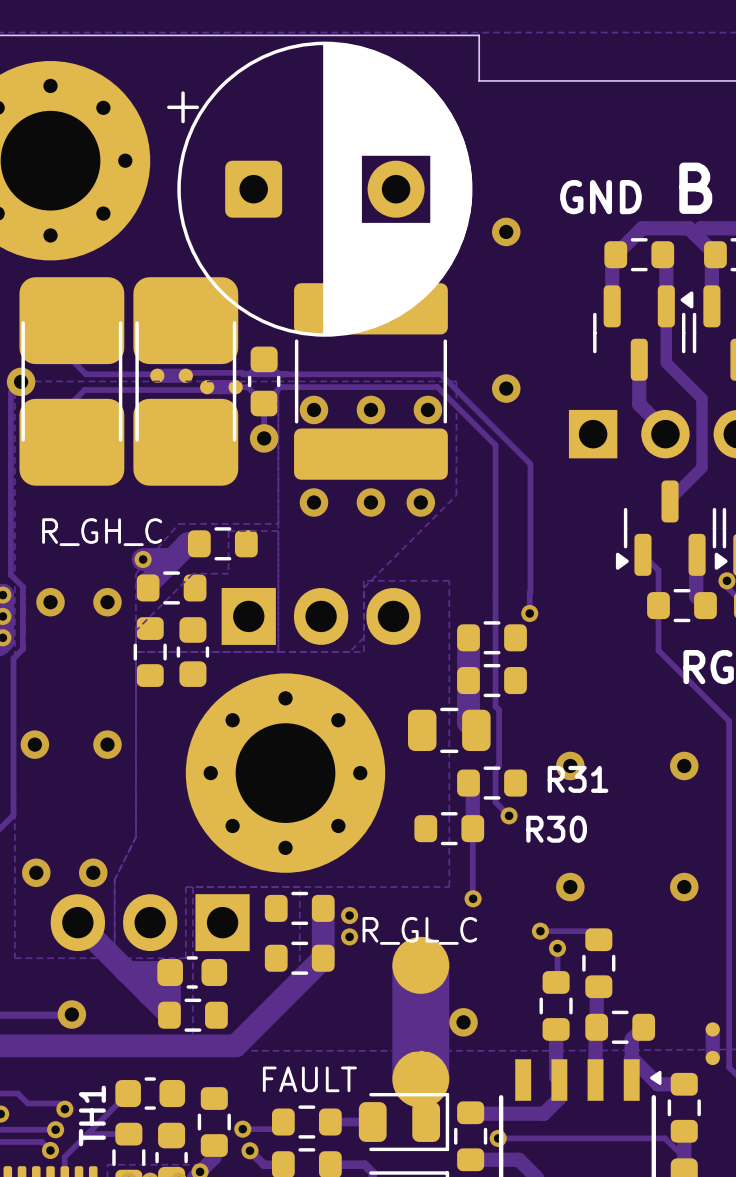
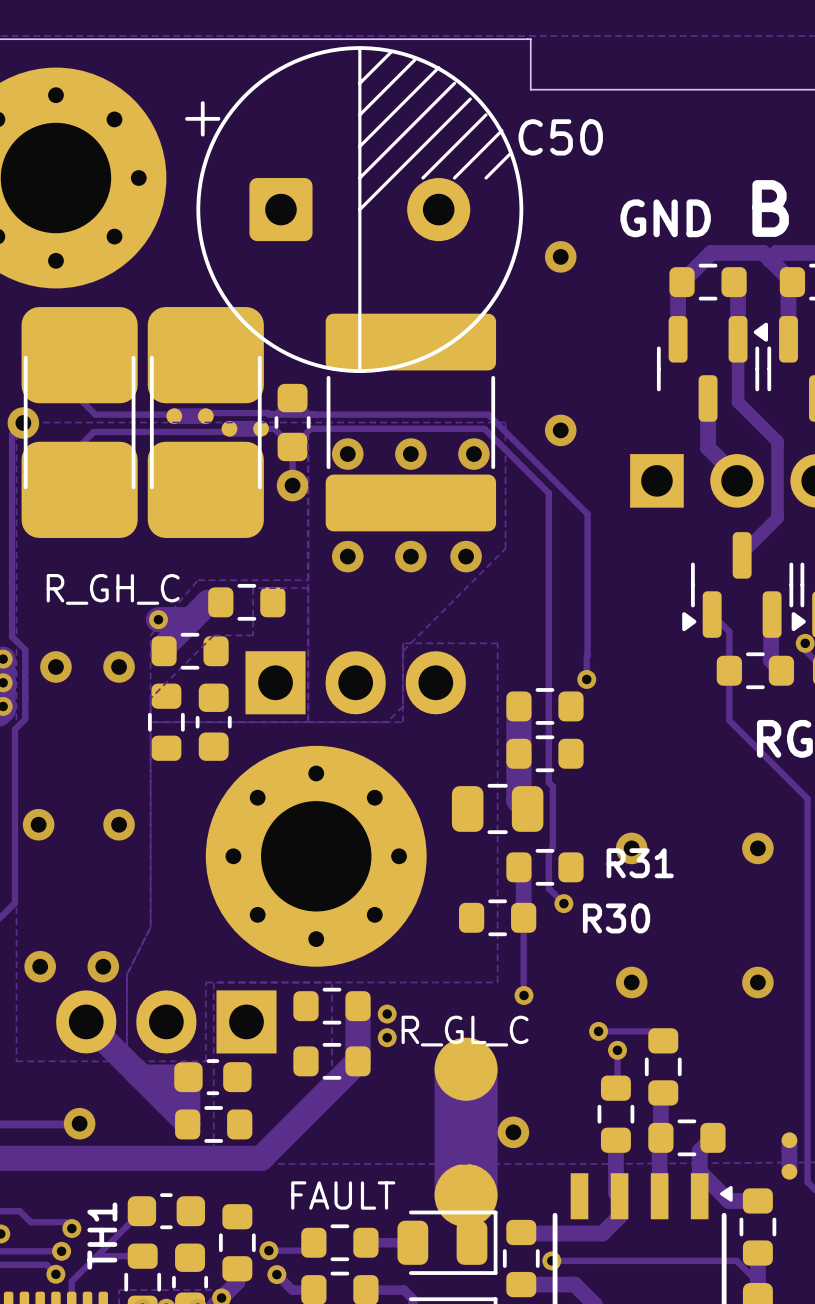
part: (319, 189) -> none
C50: none -> (354, 209)

